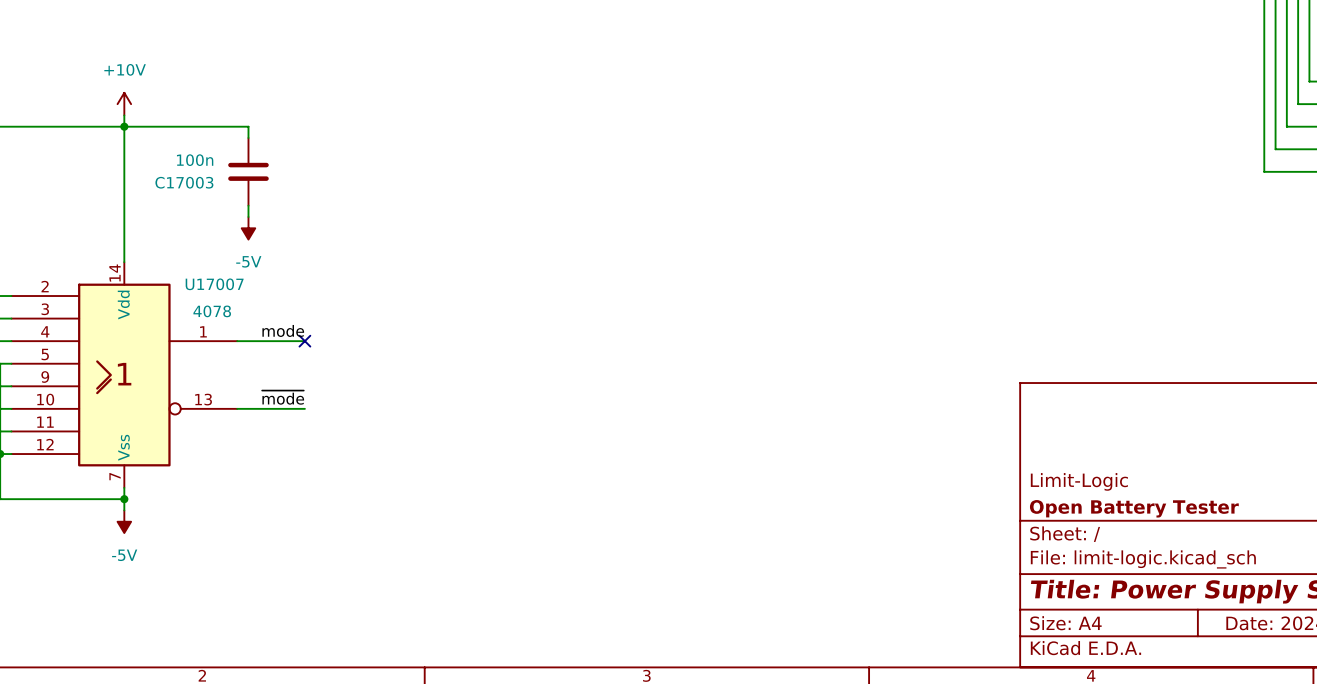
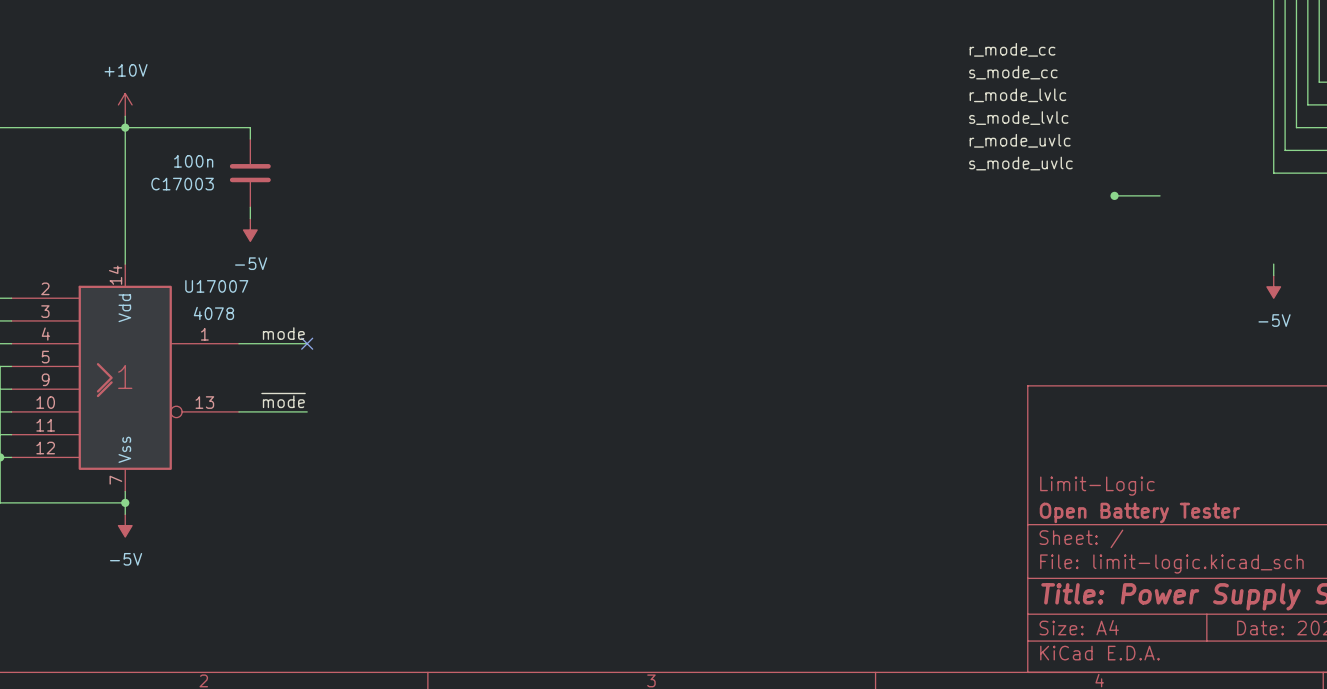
label: none -> r_mode_cc (1012, 49)
label: none -> s_mode_cc (1013, 72)
label: none -> r_mode_lvlc (1017, 95)
label: none -> s_mode_lvlc (1018, 118)
label: none -> r_mode_uvlc (1020, 140)
label: none -> s_mode_uvlc (1020, 163)
wire: none -> (1114, 195) (1160, 195)
junction: none -> (1114, 195)
wire: none -> (1273, 264) (1273, 275)
power symbol: none -> -5V (1273, 286)

